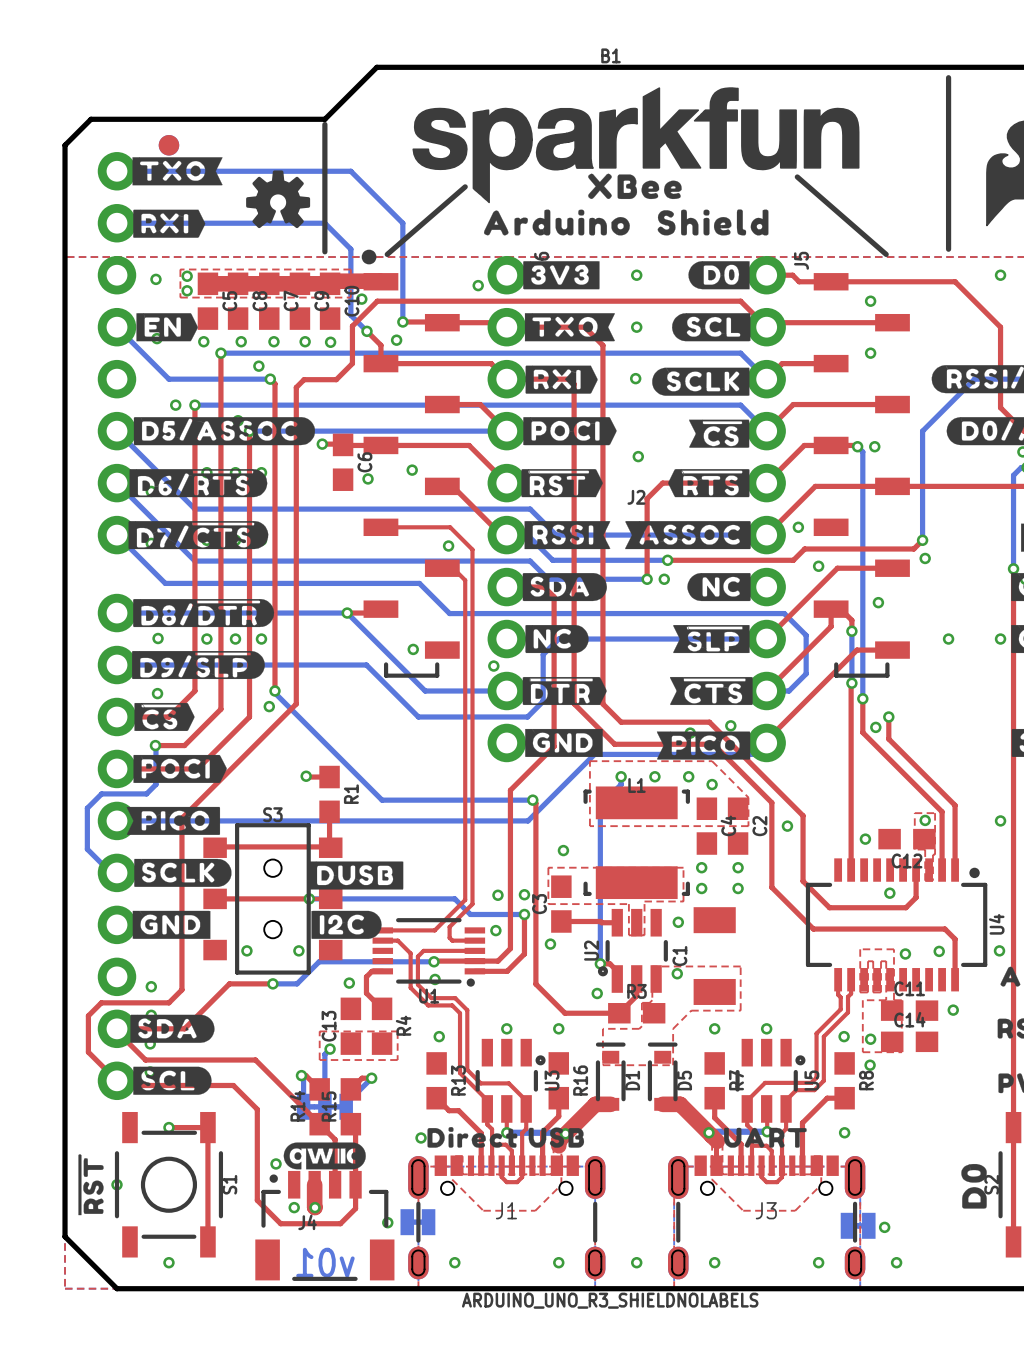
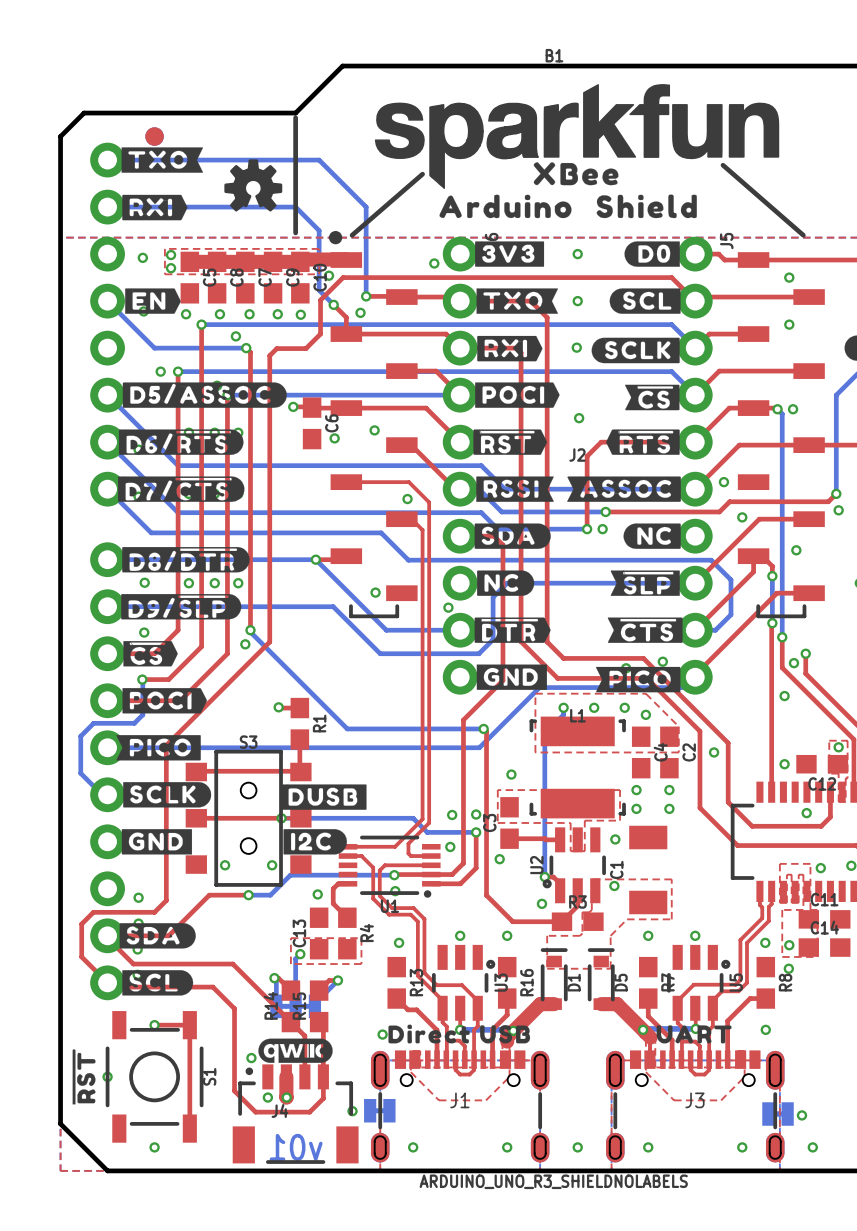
via: none -> (784, 696)

